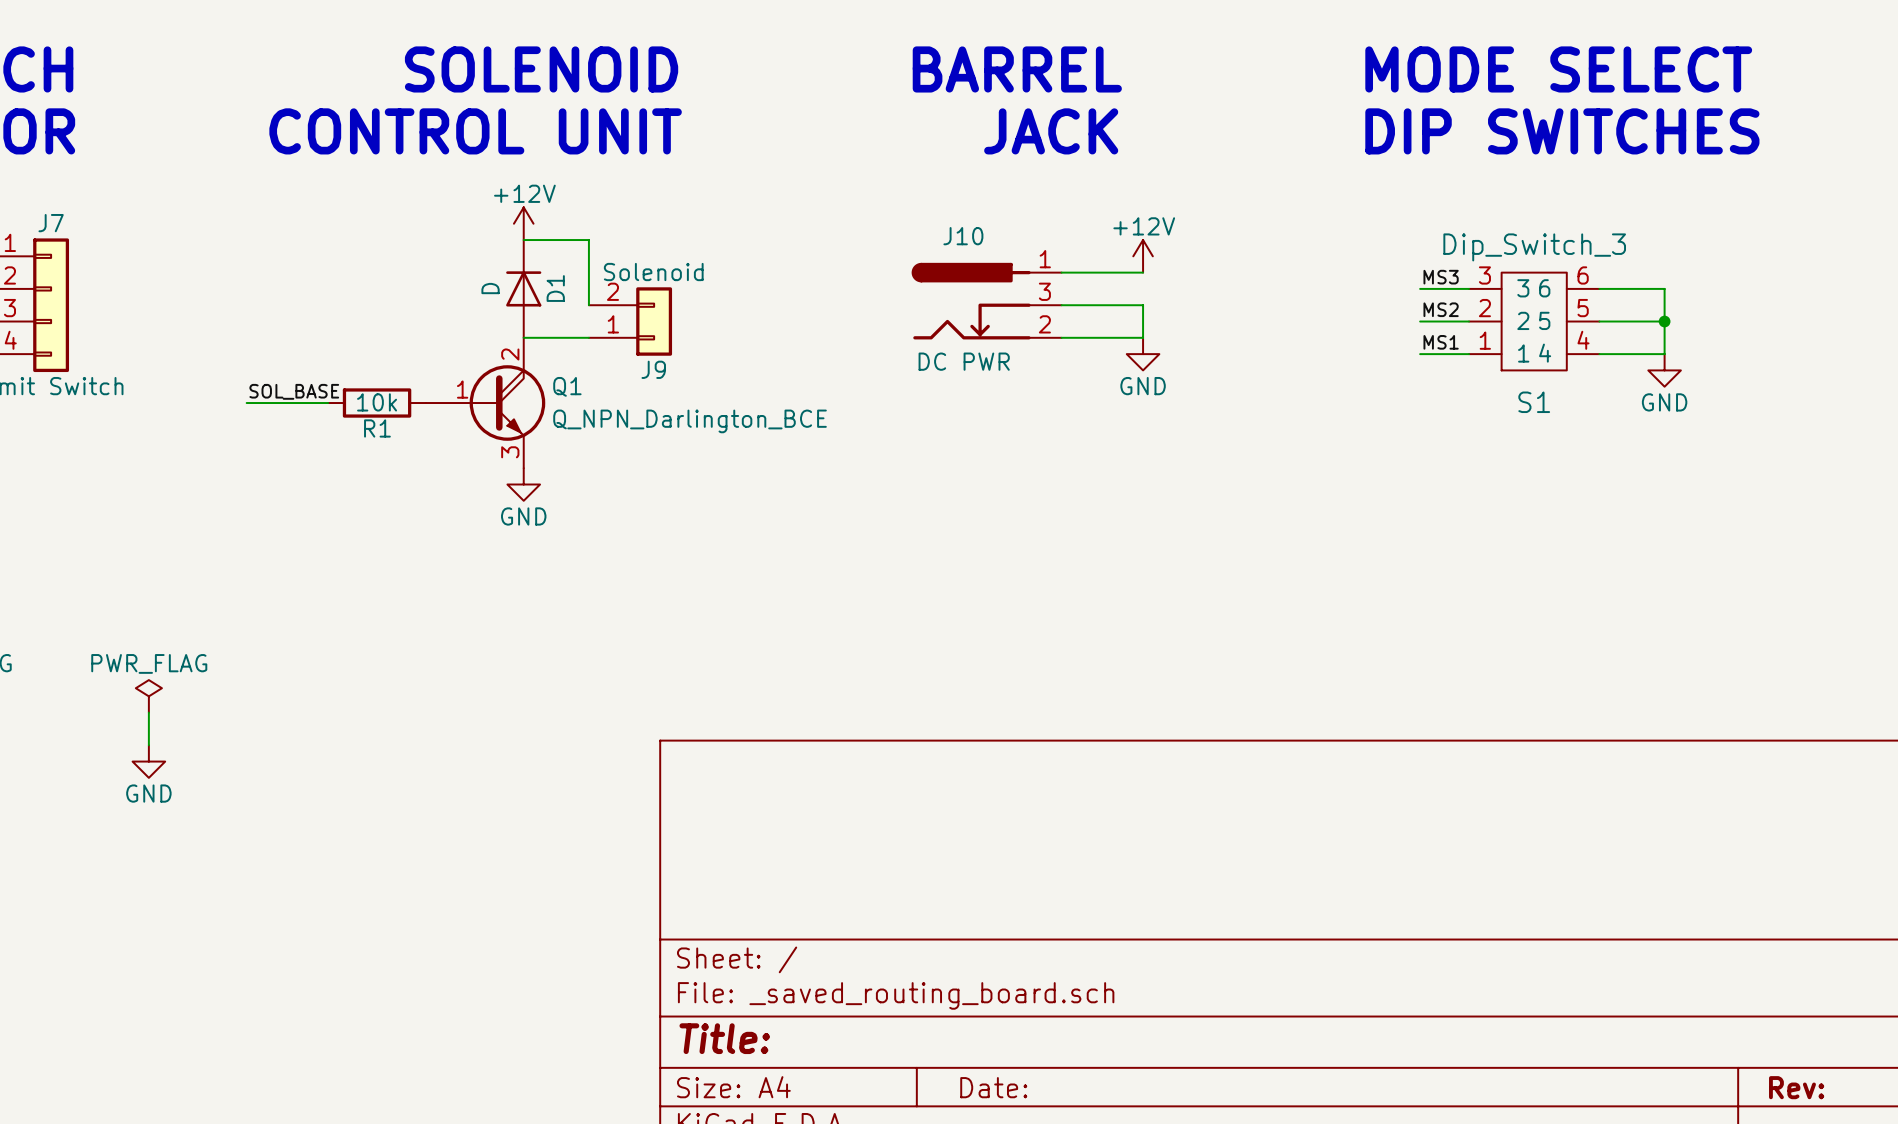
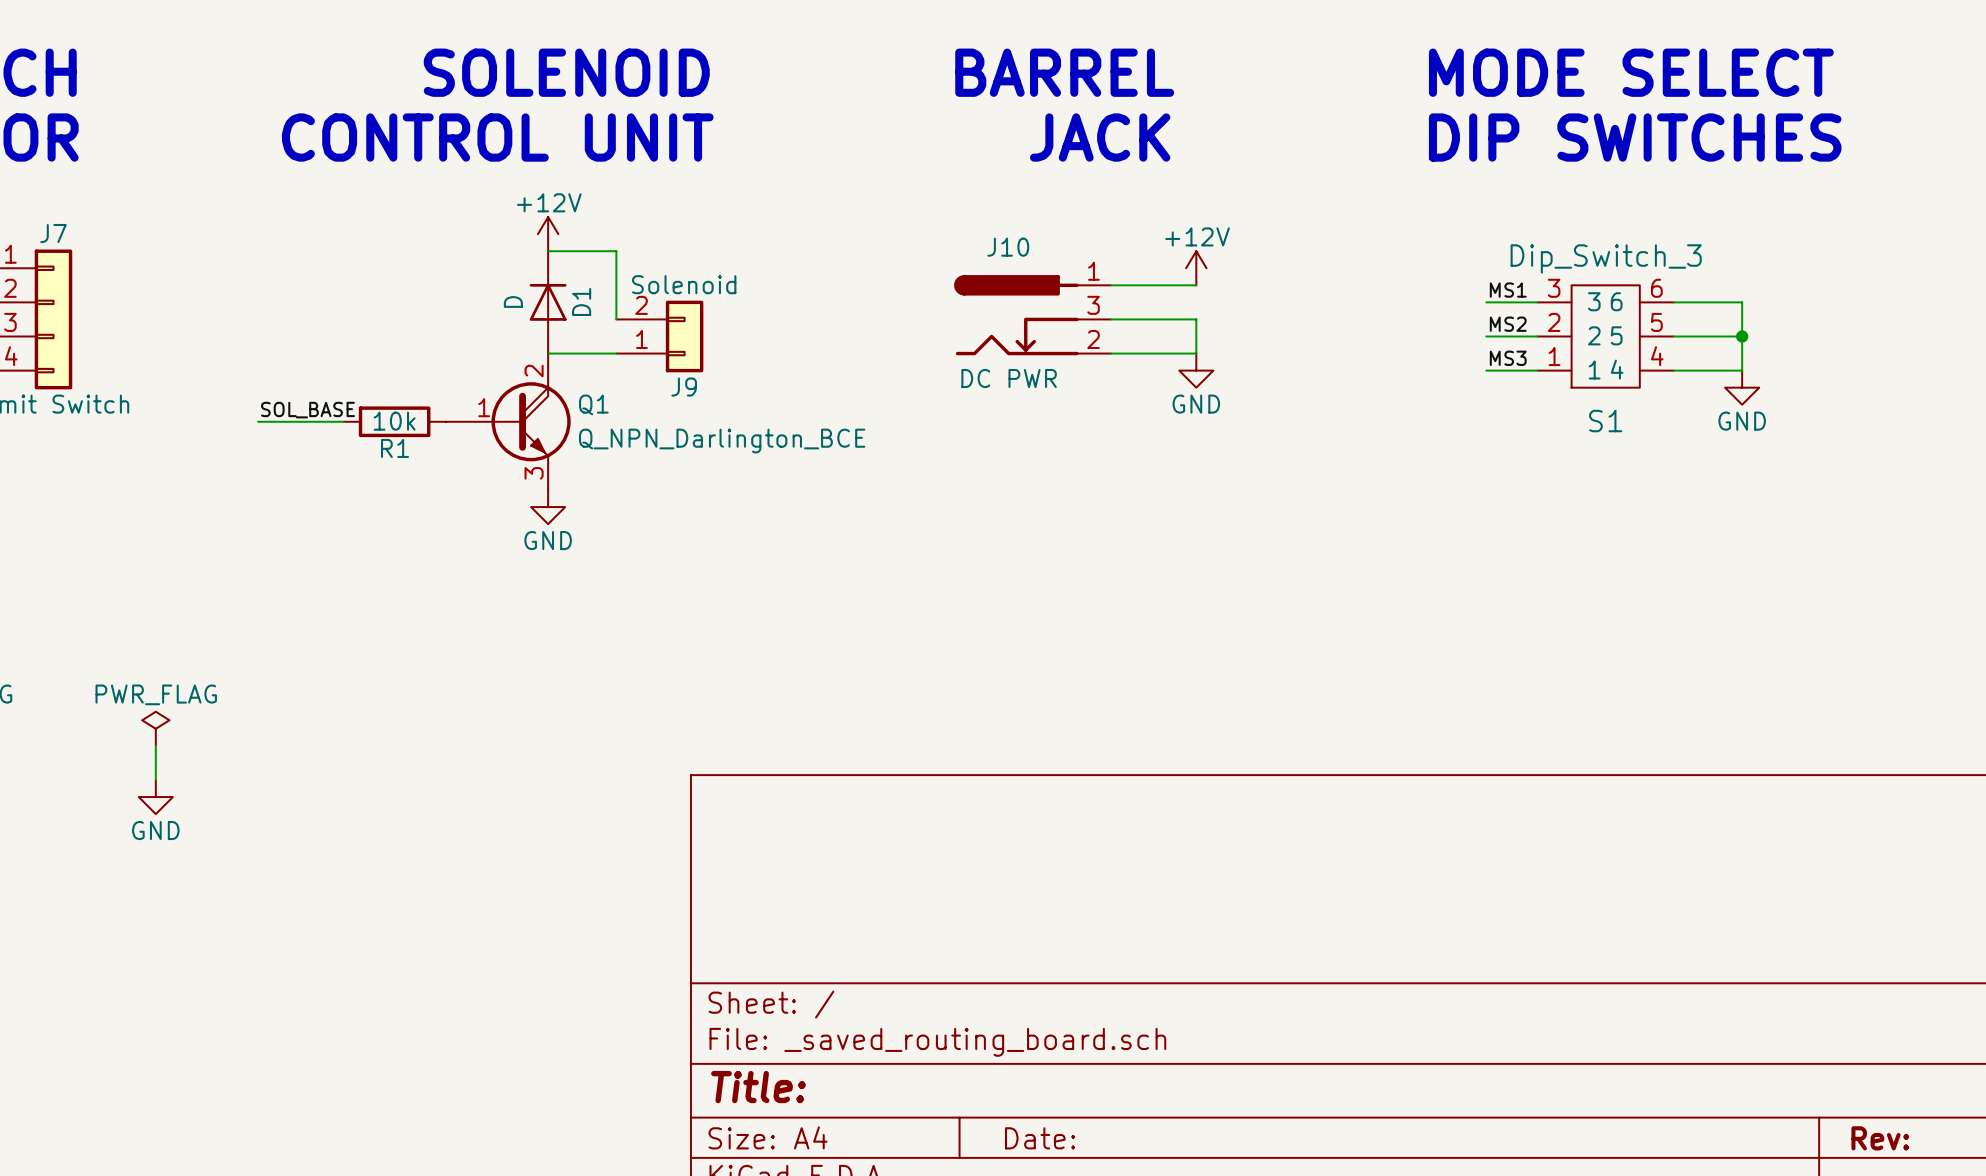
label: MS3 (1441, 277) -> MS1 (1508, 290)
label: MS1 (1441, 342) -> MS3 (1508, 358)

